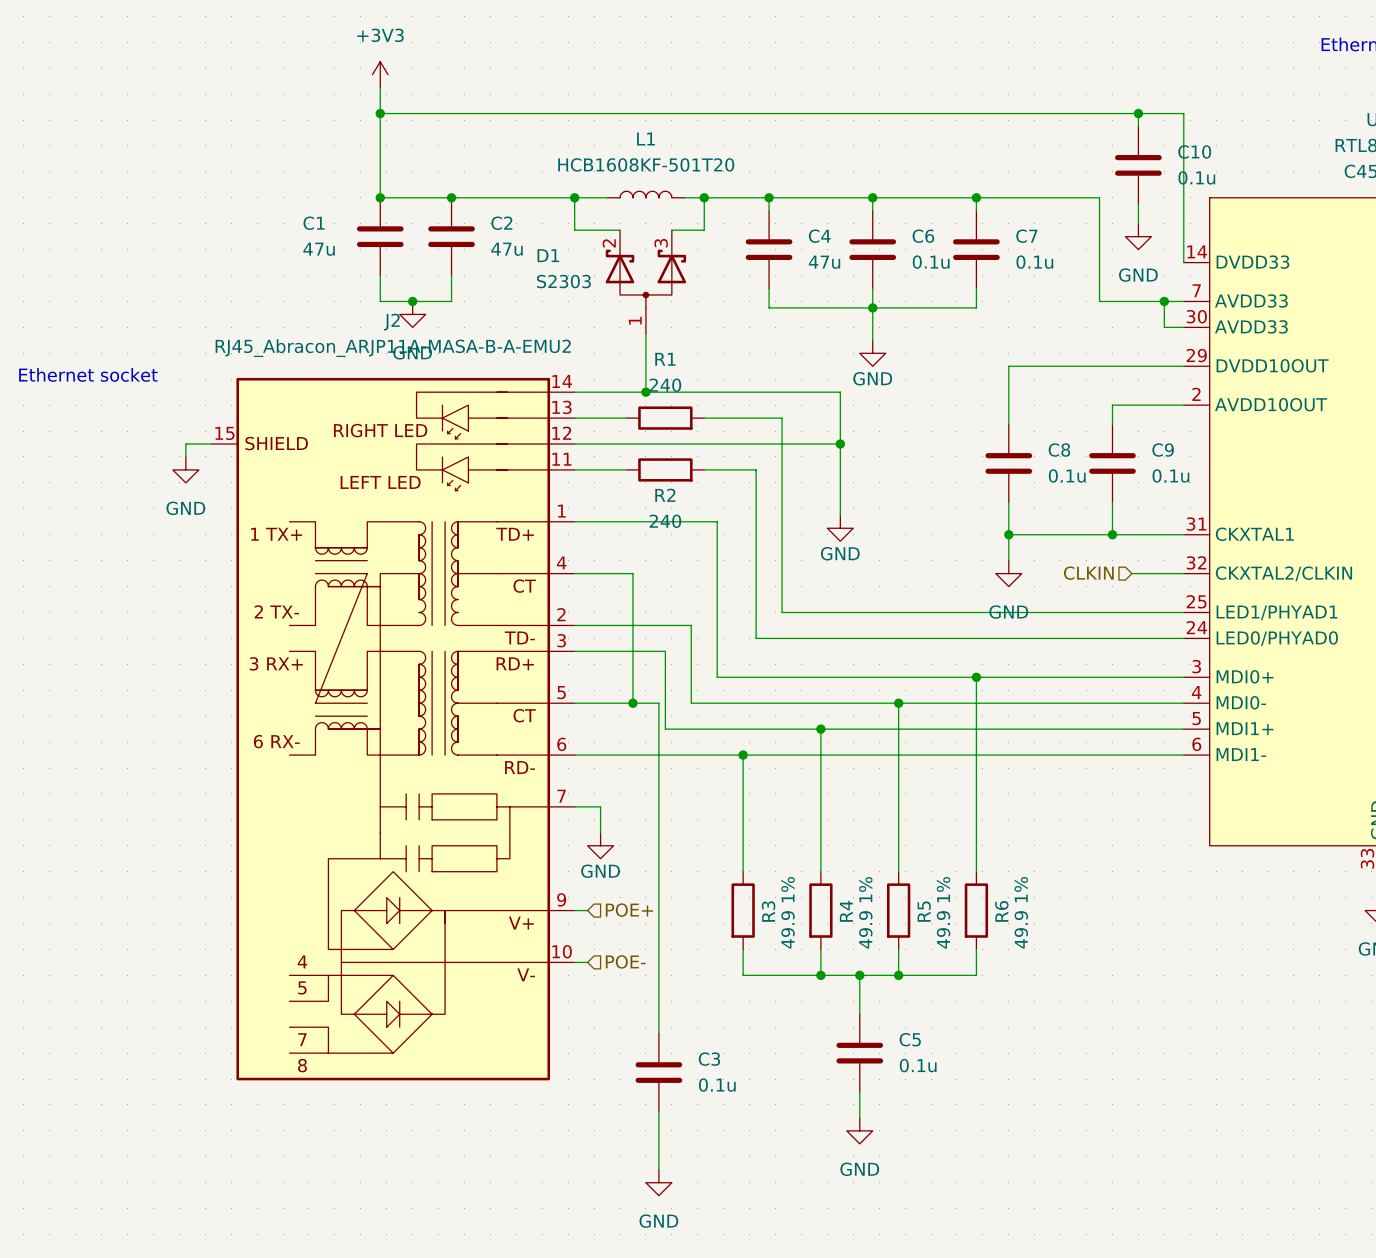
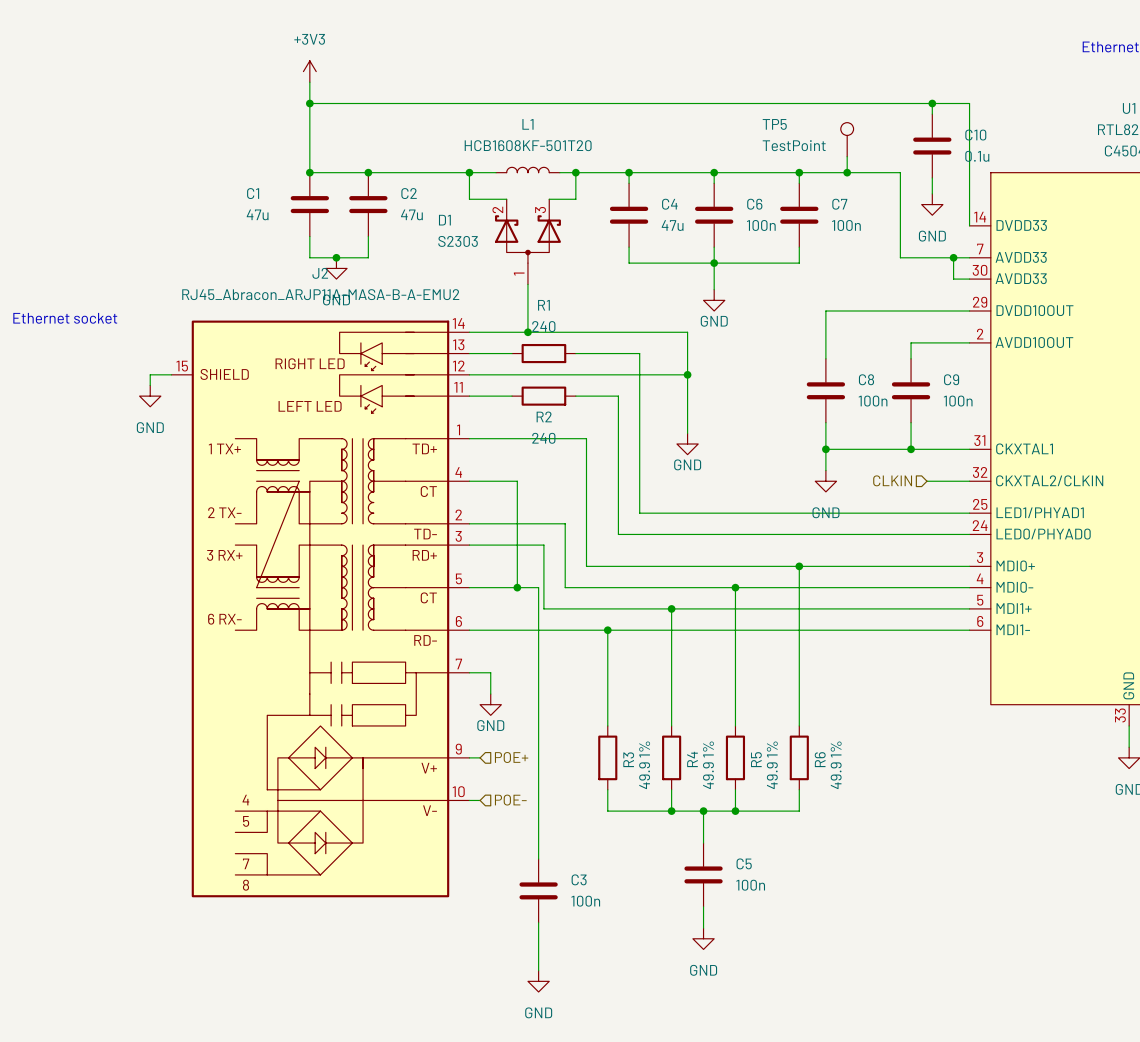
TP5: none -> TestPoint (847, 139)
wire: none -> (847, 156) (847, 172)
junction: none -> (847, 172)
C6 value: 0.1u (931, 262) -> 100n (761, 225)
C7 value: 0.1u (1034, 262) -> 100n (846, 225)
C8 value: 0.1u (1067, 475) -> 100n (873, 401)
C9 value: 0.1u (1170, 475) -> 100n (958, 401)
C5 value: 0.1u (918, 1065) -> 100n (750, 885)
C3 value: 0.1u (717, 1085) -> 100n (585, 901)

